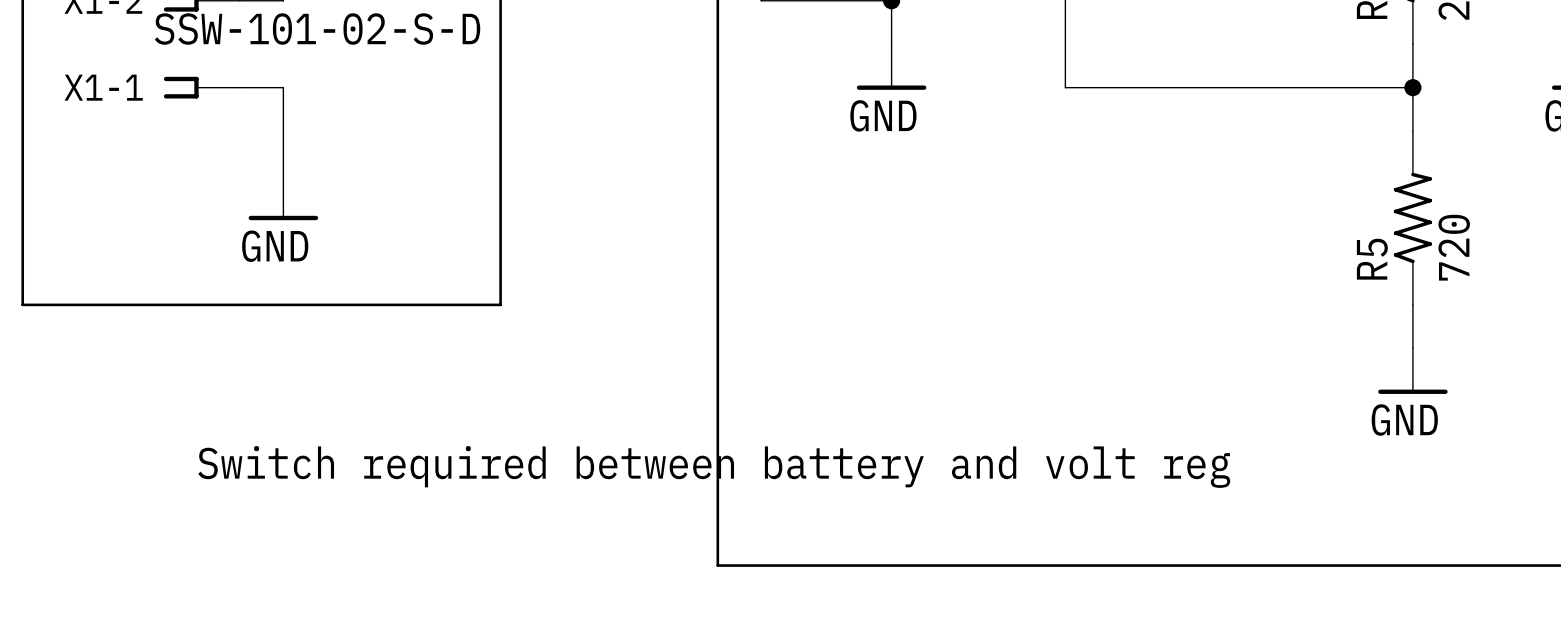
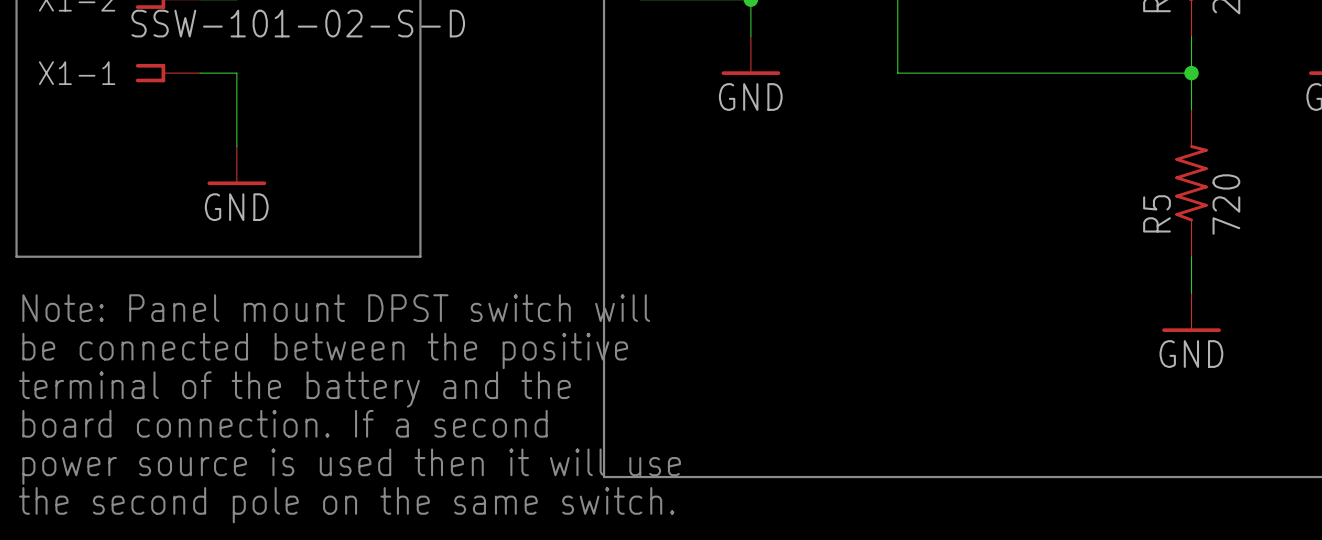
text: none -> Note: Panel mount DPST switch will (336, 308)
text: none -> be connected between the positive (325, 350)
text: none -> terminal of the battery and the (294, 389)
text: Switch required between battery and volt reg (714, 466) -> none
text: none -> board connection. If a second (285, 423)
text: none -> power source is used then it will use (351, 466)
text: none -> the second pole on the same switch. (346, 505)

